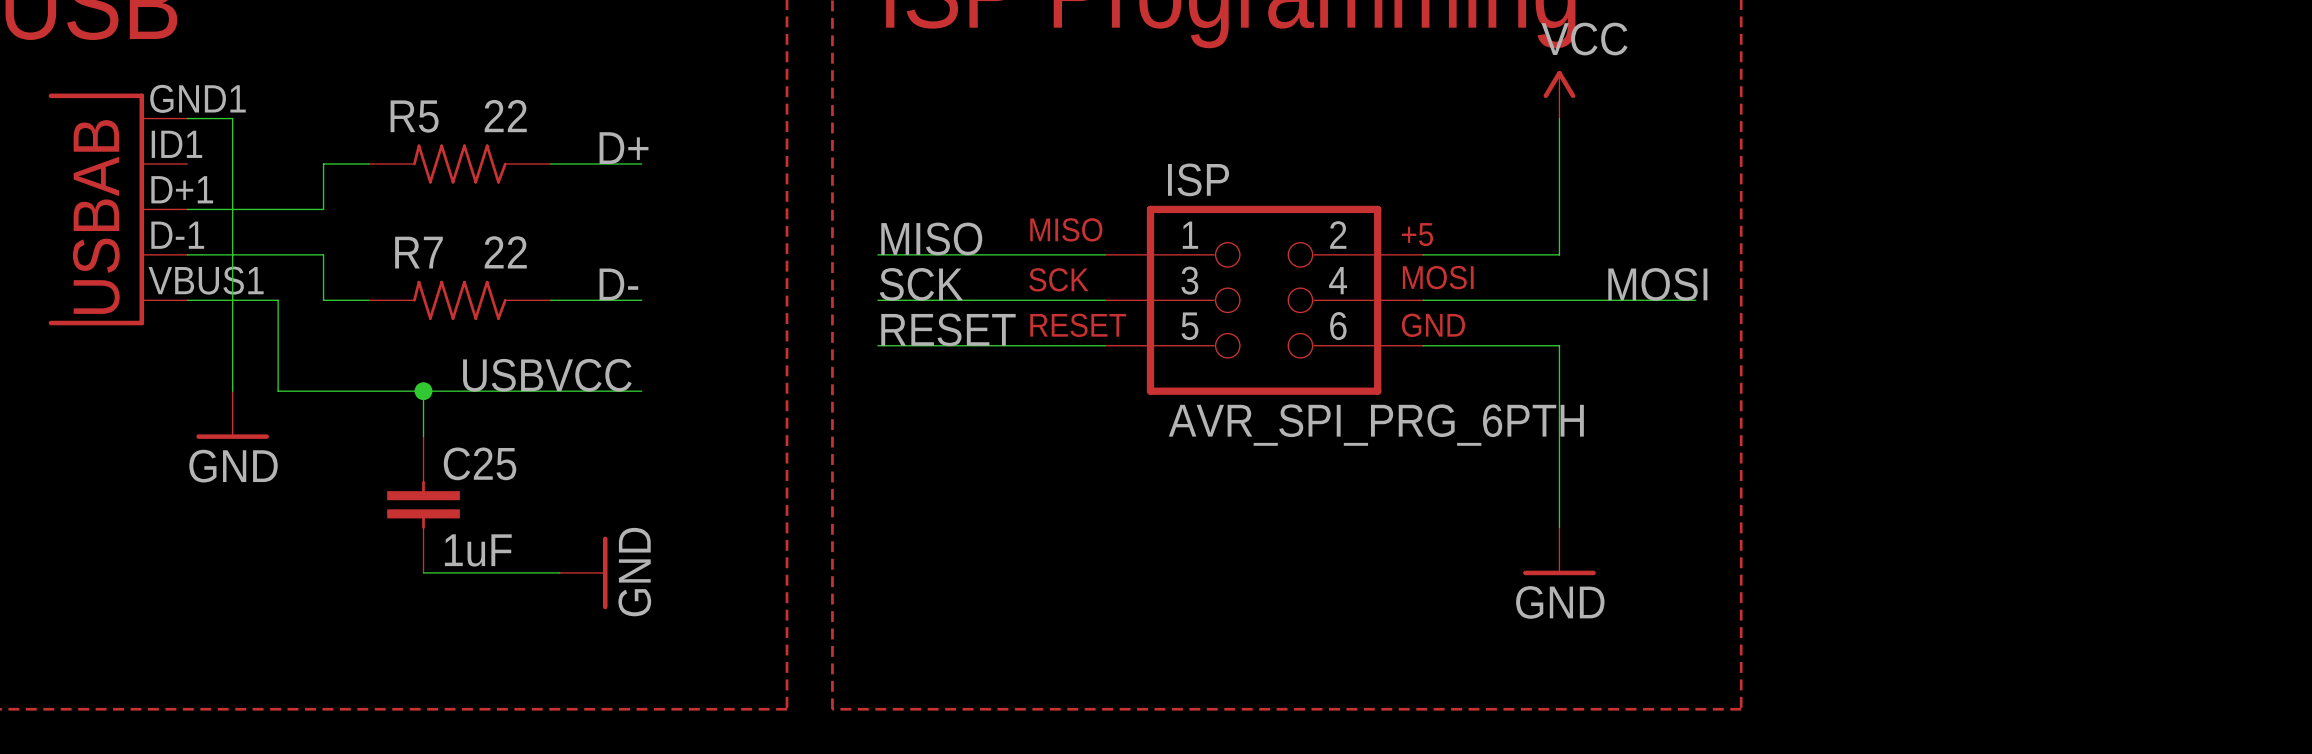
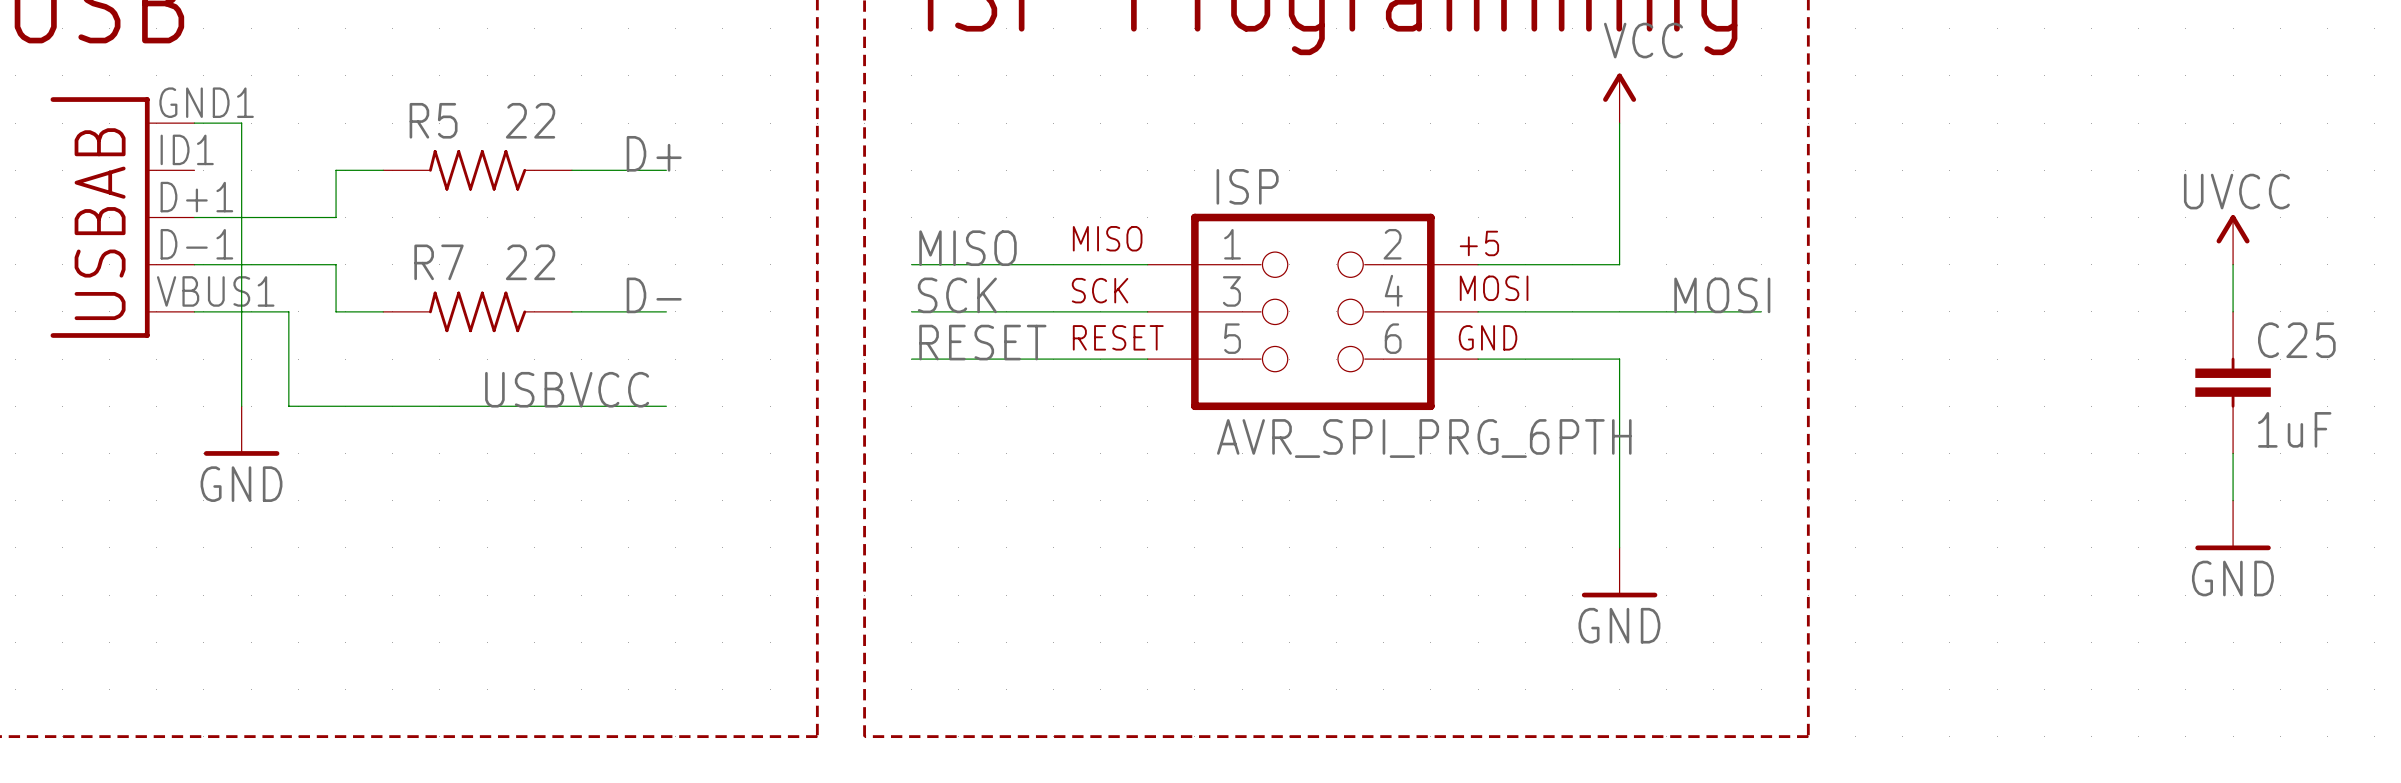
power symbol: none -> UVCC (2233, 239)
wire: none -> (2233, 264) (2233, 311)
wire: (423, 391) (423, 436) -> none
junction: (423, 391) -> none
wire: none -> (2233, 453) (2233, 500)
C25 position: (423, 504) -> (2233, 382)
power symbol: none -> GND (2233, 525)
wire: (423, 572) (559, 572) -> none
power symbol: GND (583, 572) -> none

